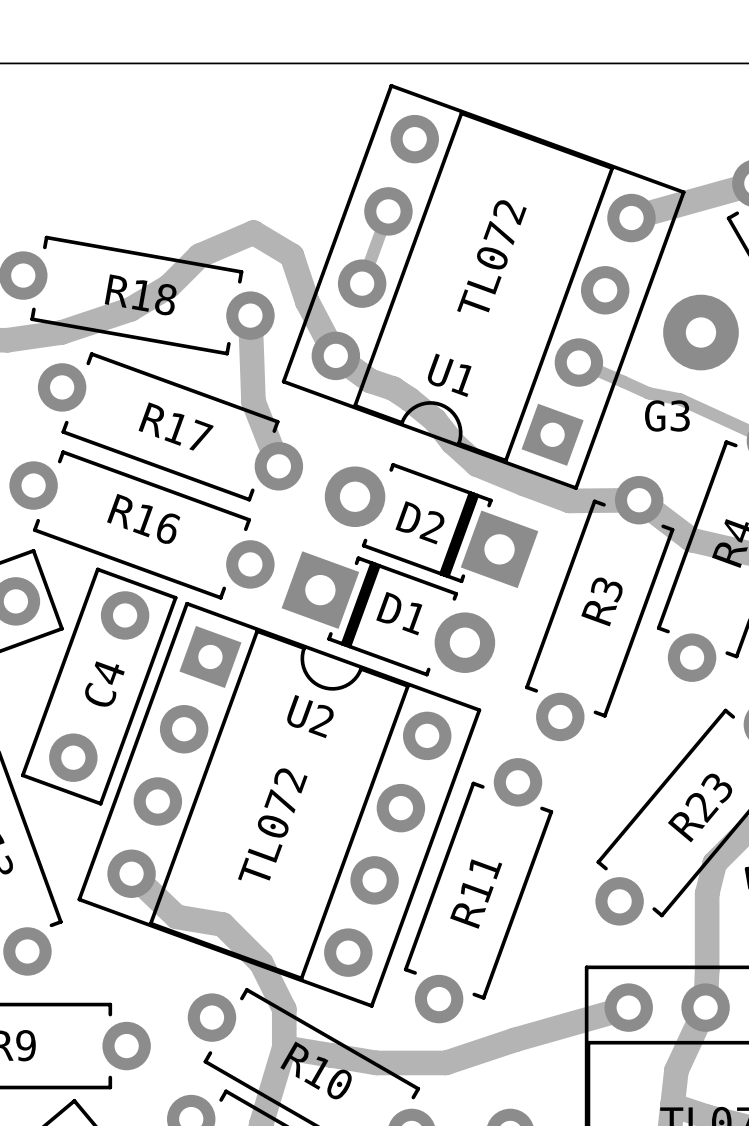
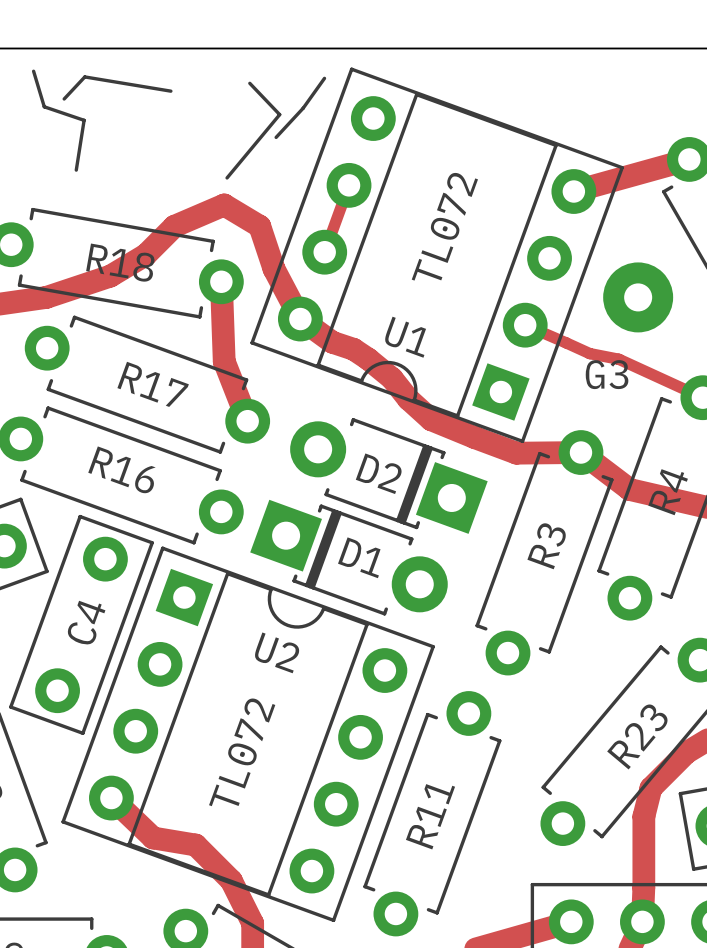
line: none -> (33, 71) (44, 106) (84, 120) (76, 170)
line: none -> (324, 78) (303, 108) (276, 137)
line: none -> (249, 83) (279, 114) (227, 177)
line: none -> (170, 91) (84, 76) (64, 98)

